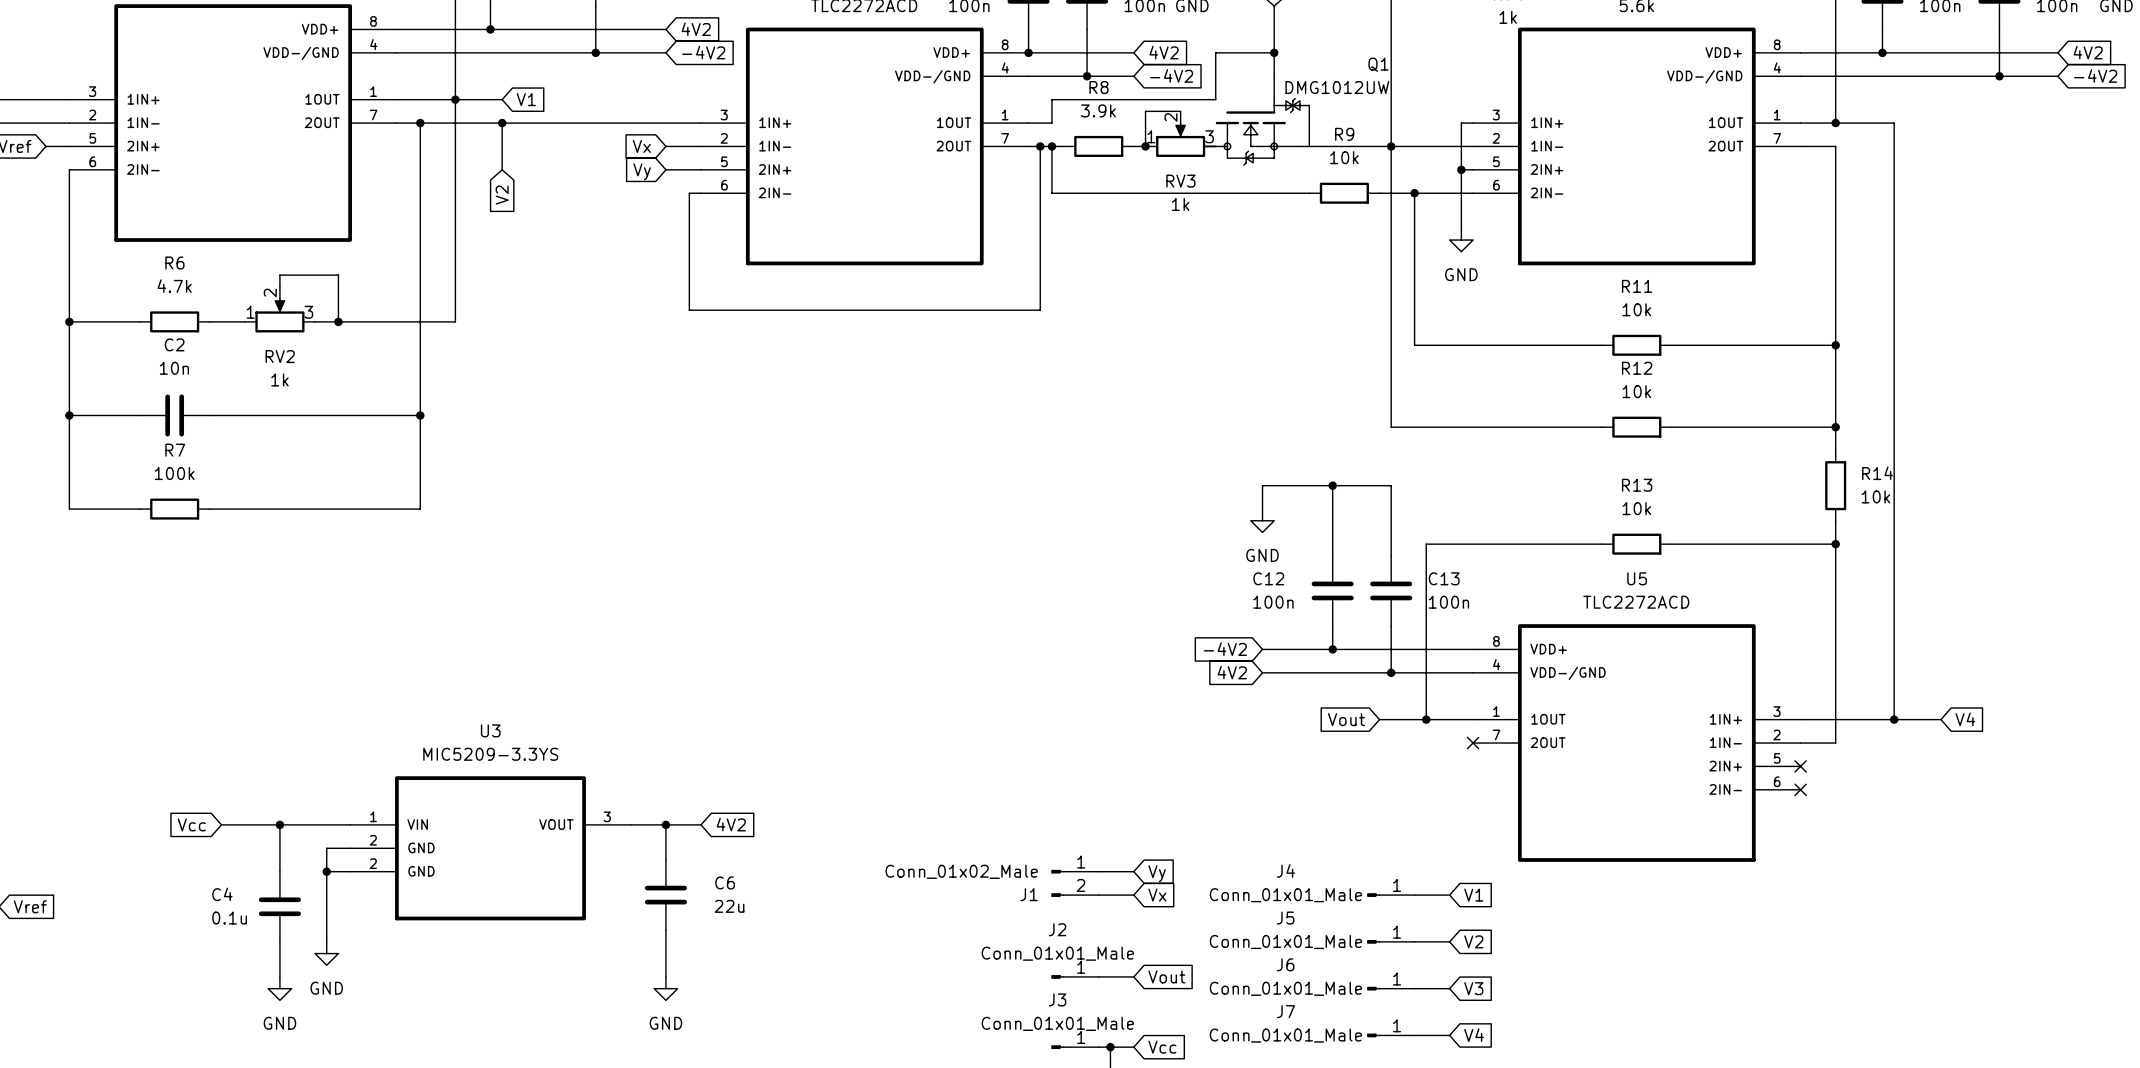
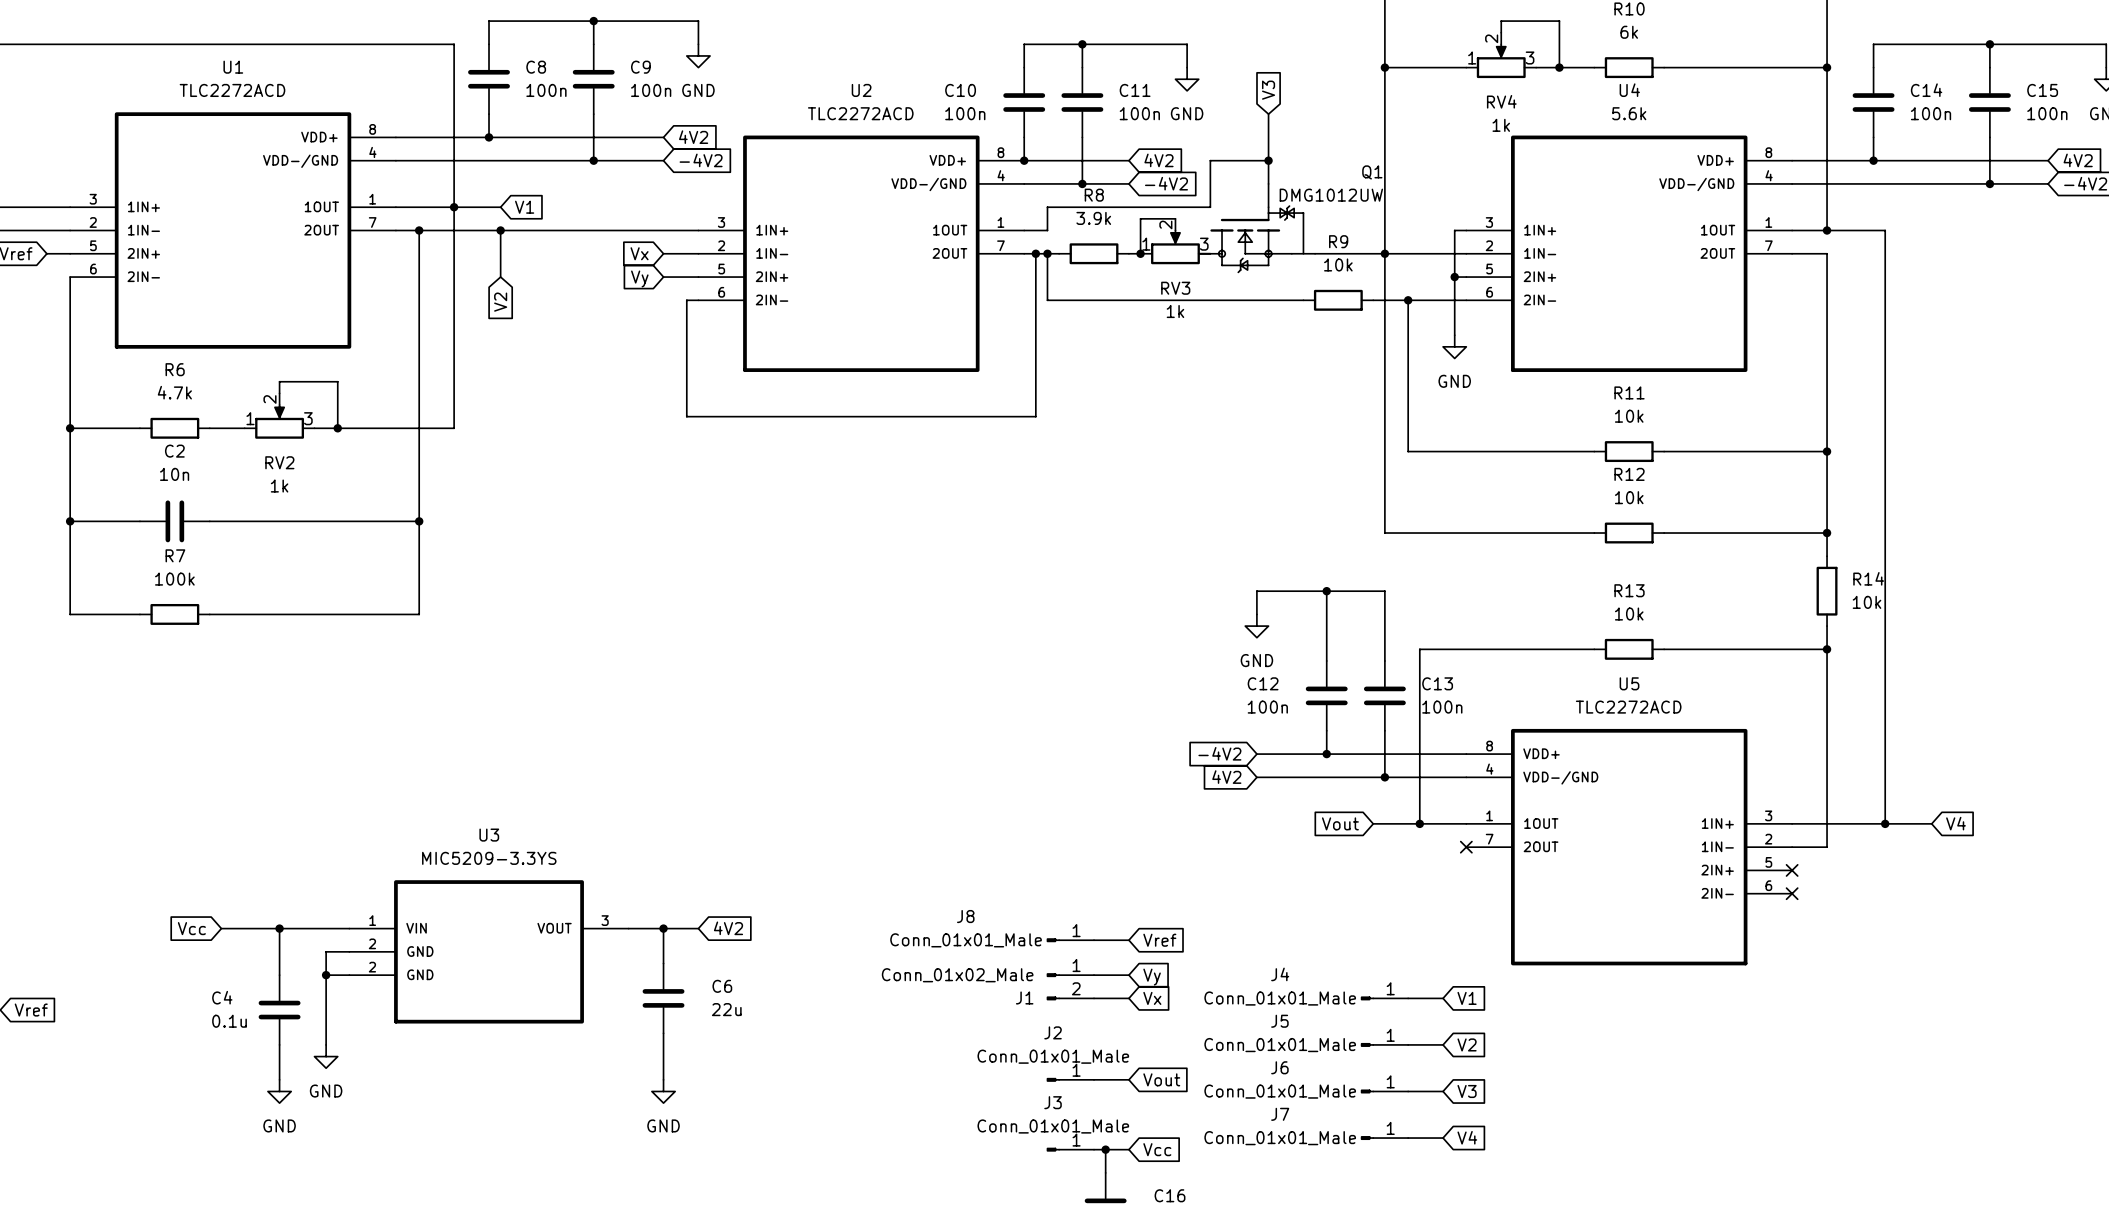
J8: none -> Conn_01x01_Male (1070, 940)
wire: none -> (1094, 940) (1128, 940)
global label: none -> Vref (1159, 940)

